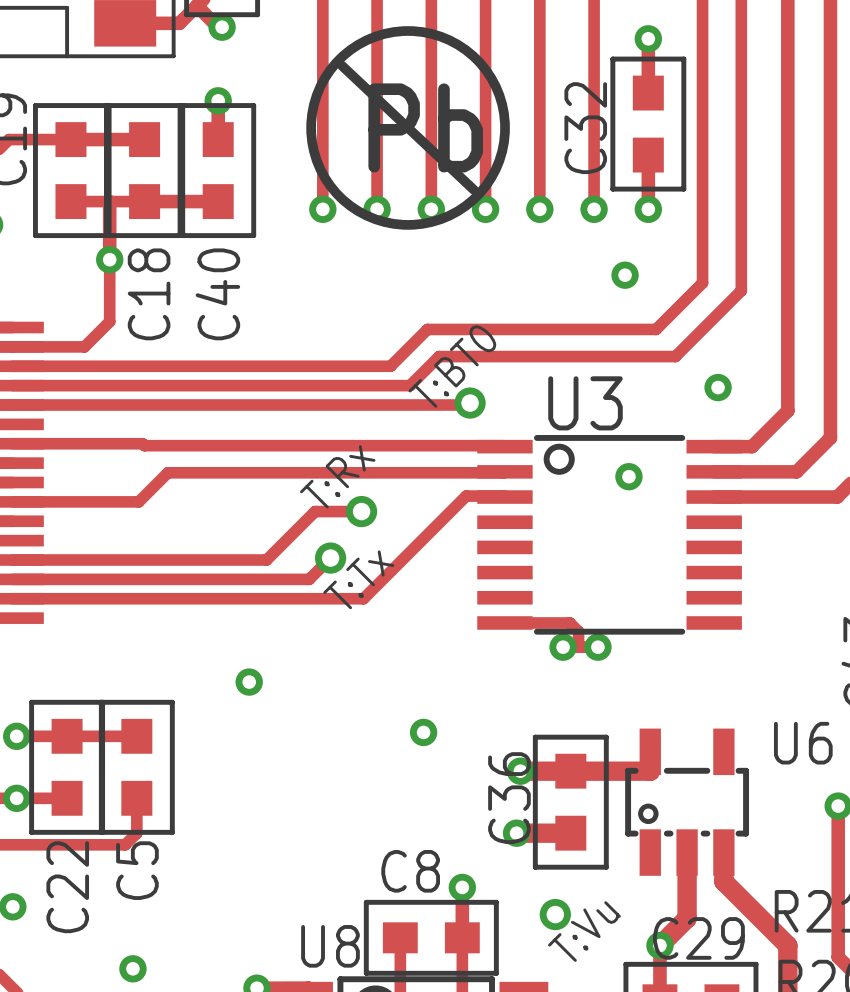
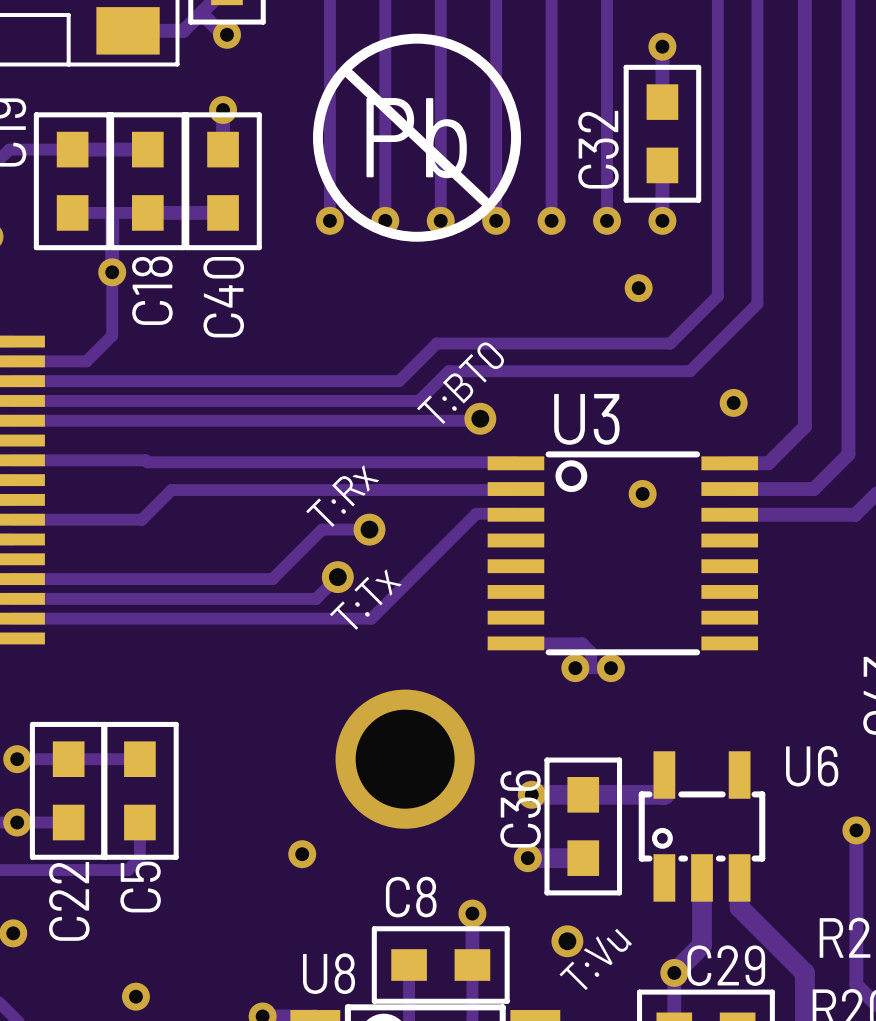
via: (249, 682) -> none
via size: [409, 718, 438, 747] -> [335, 689, 475, 829]
via: none -> (302, 854)

